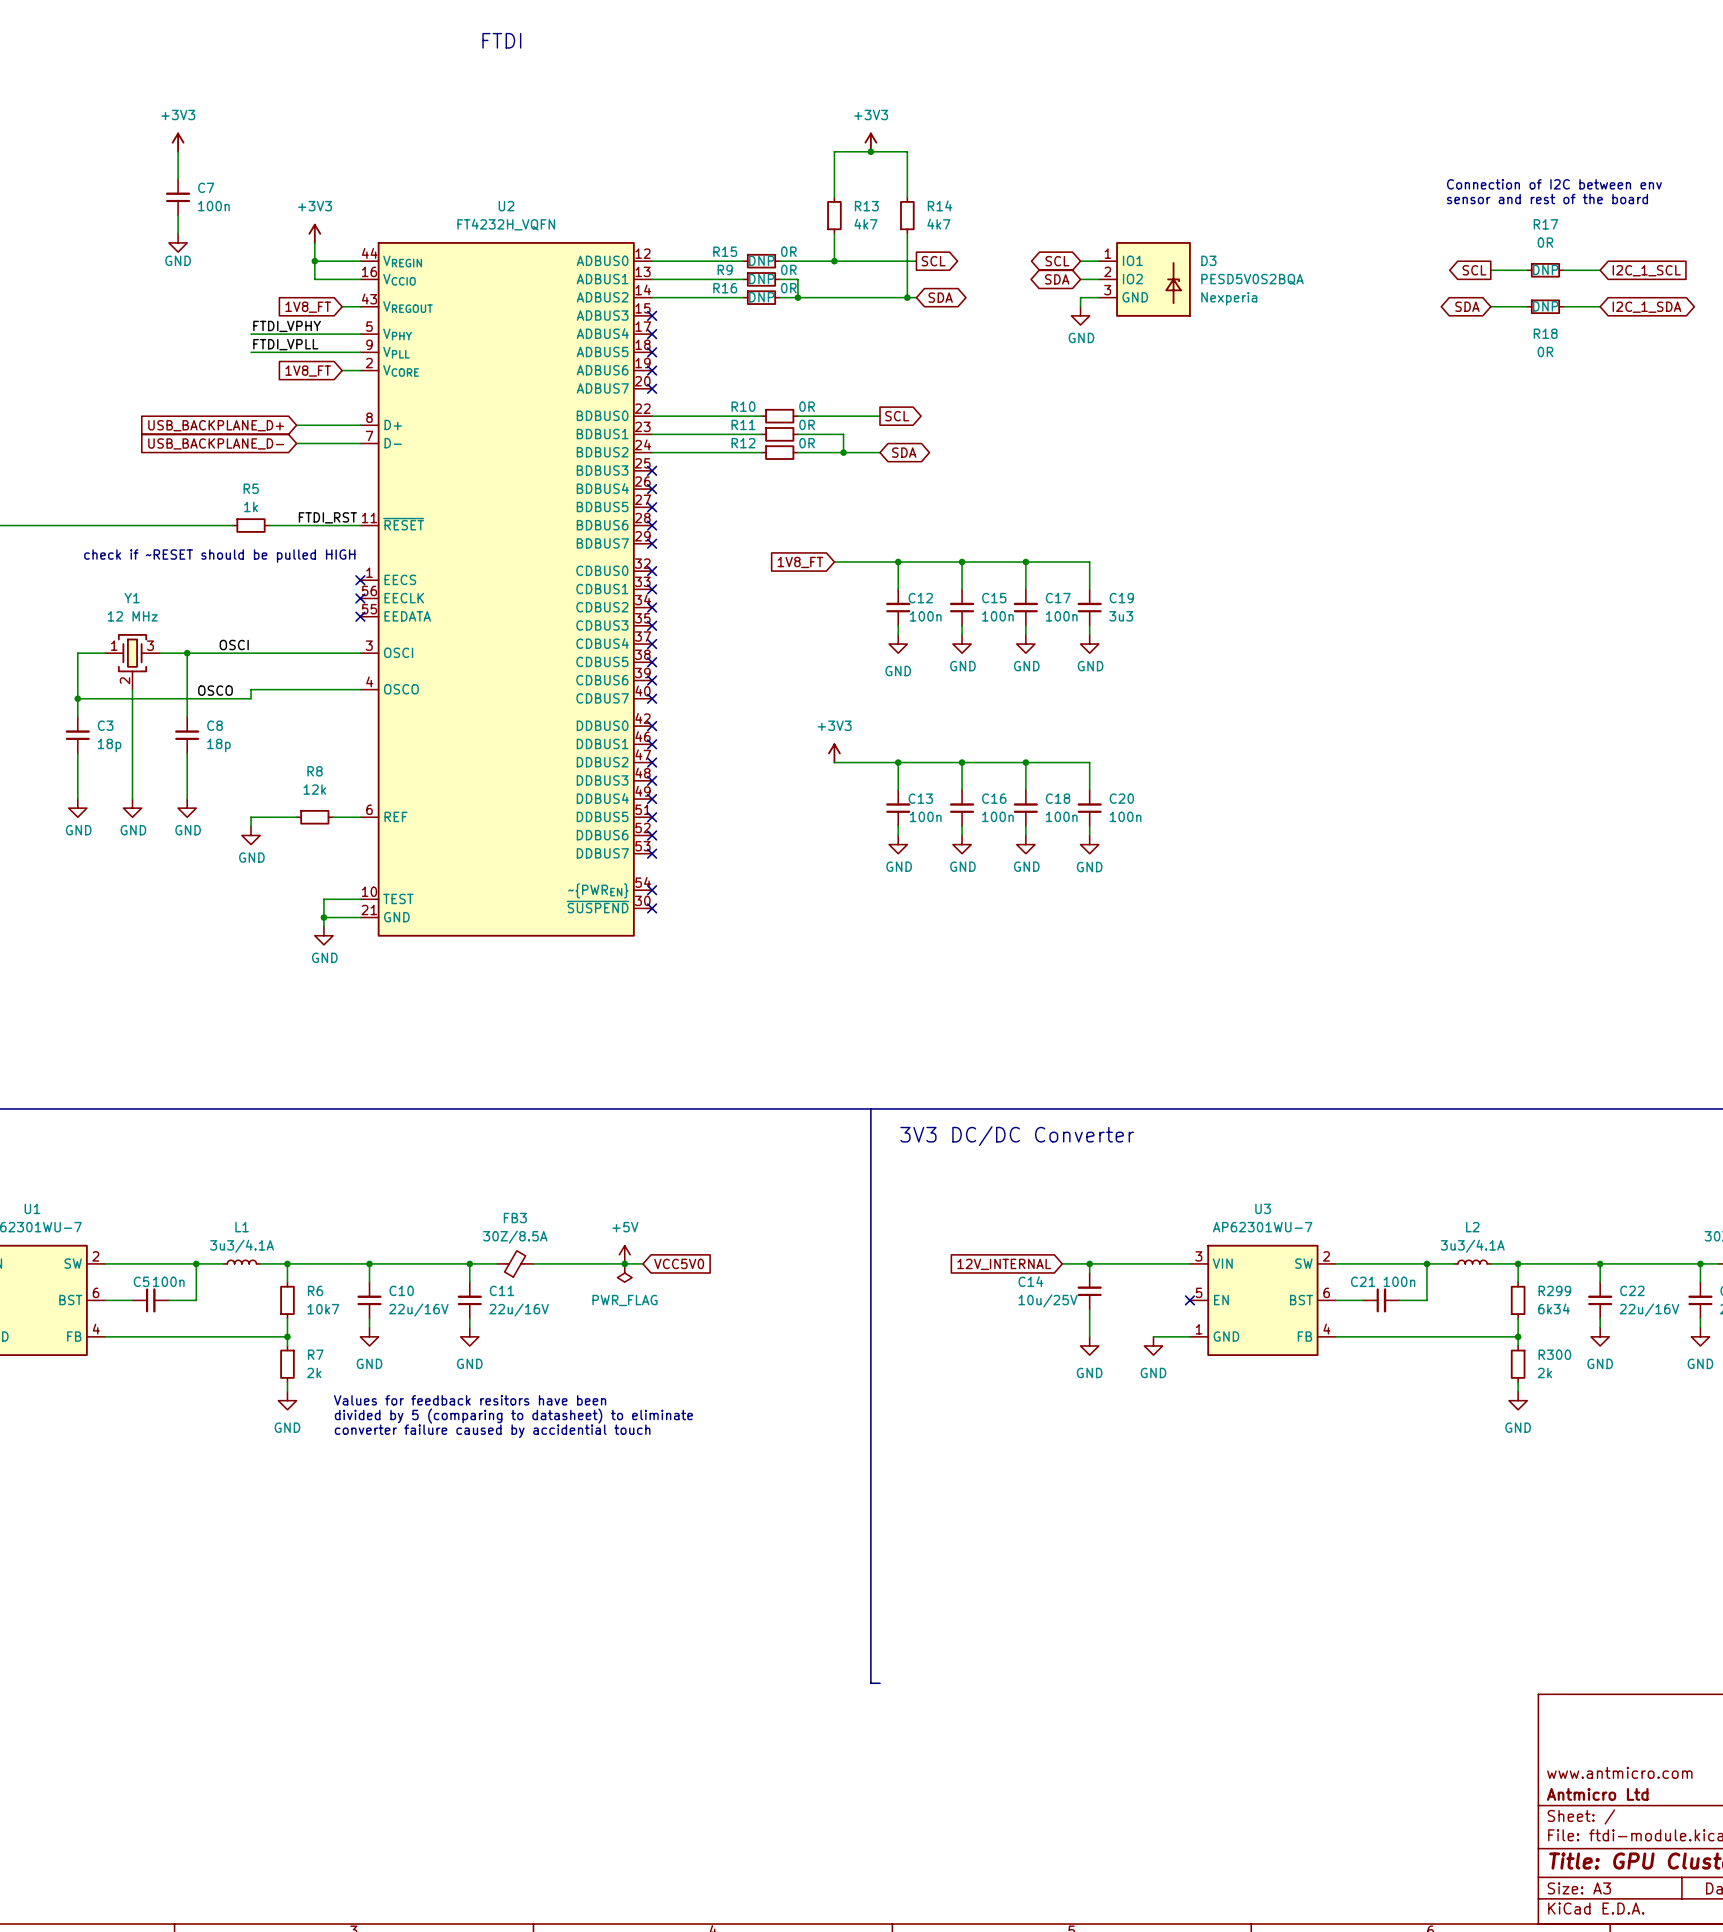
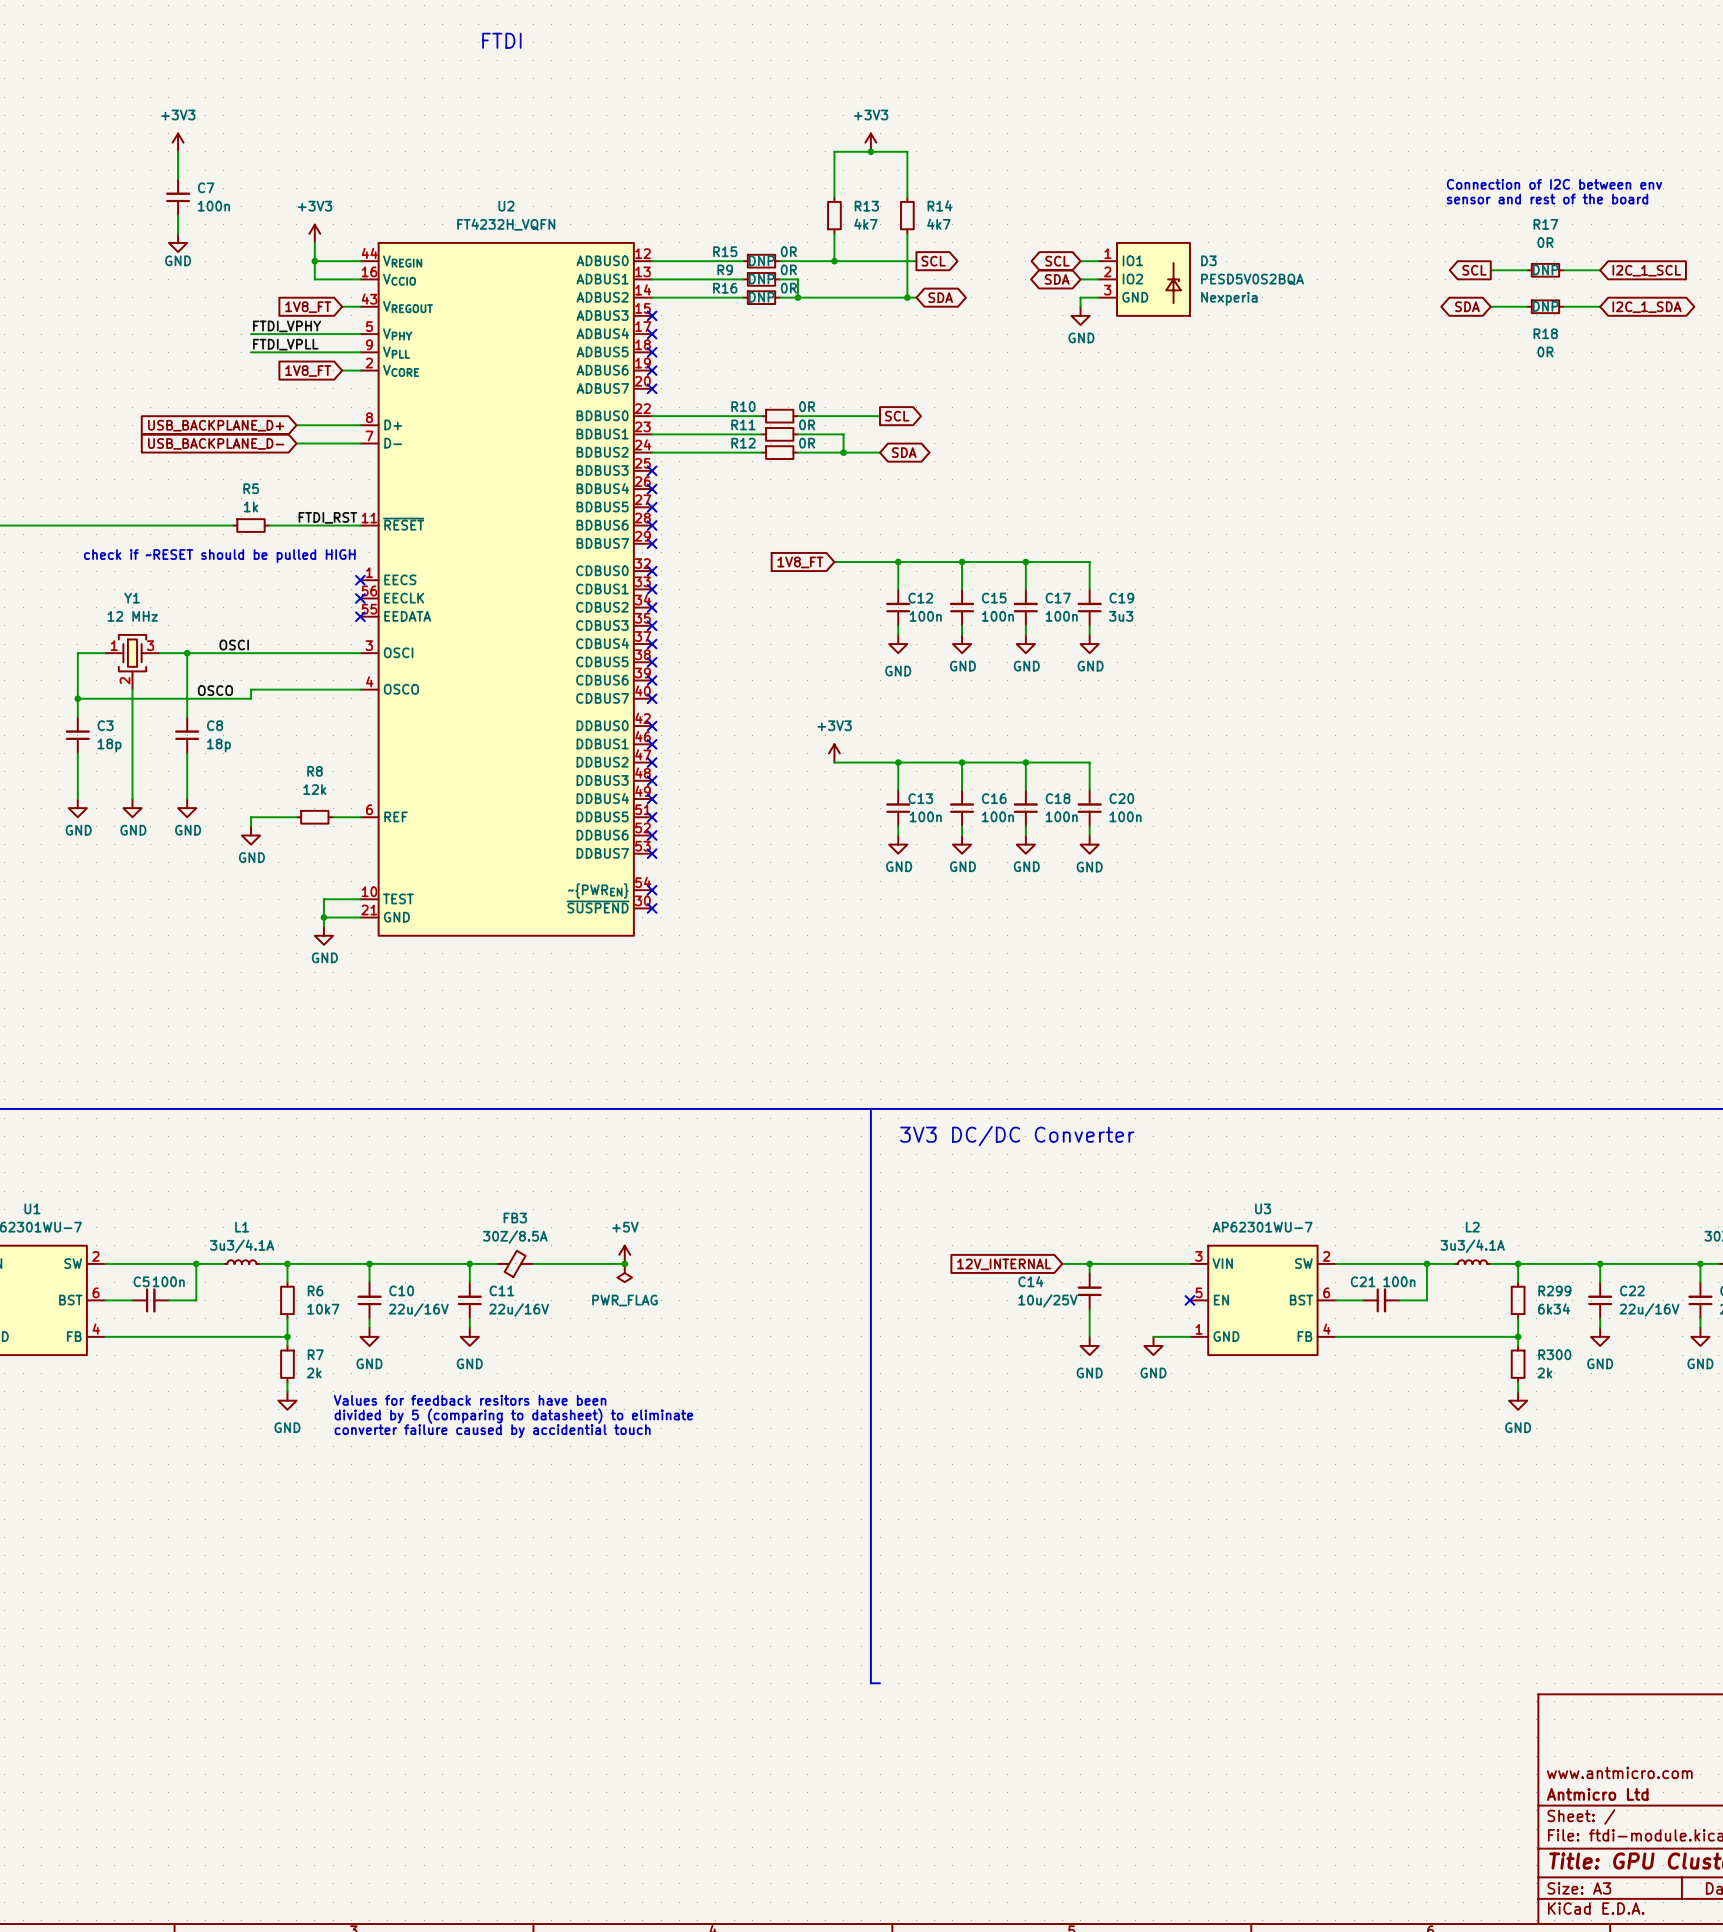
wire: (624, 1263) (642, 1263) -> none
global label: VCC5V0 (679, 1263) -> none

